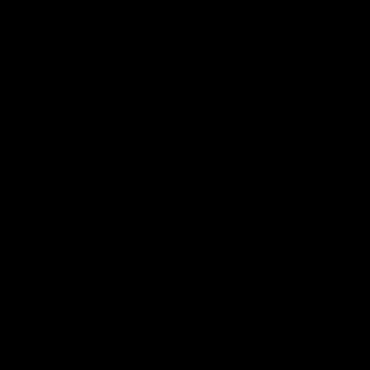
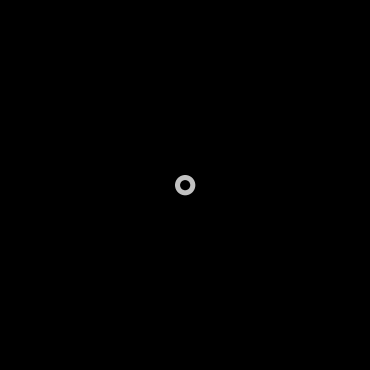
via: none -> (185, 185)

